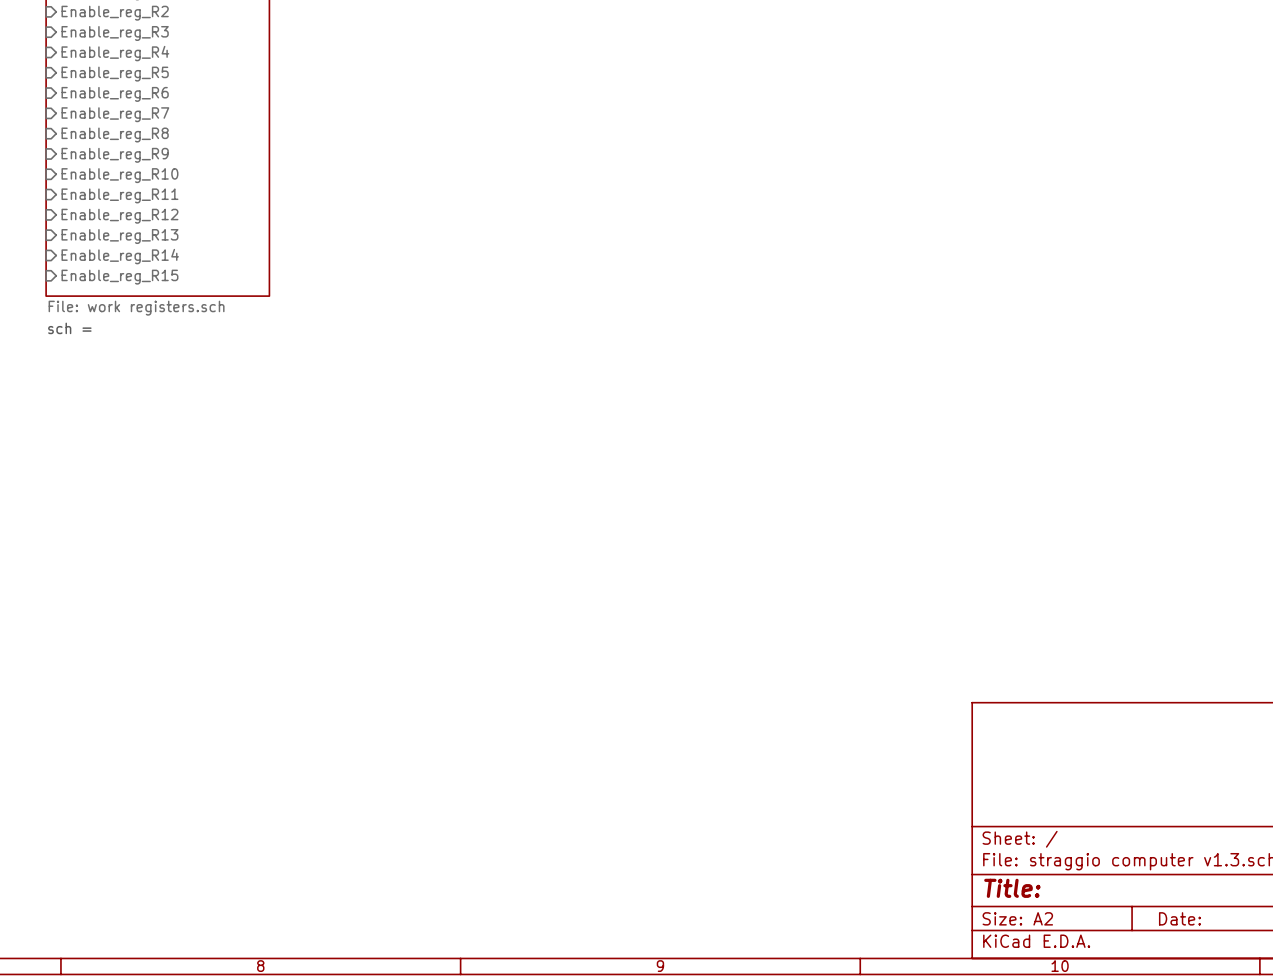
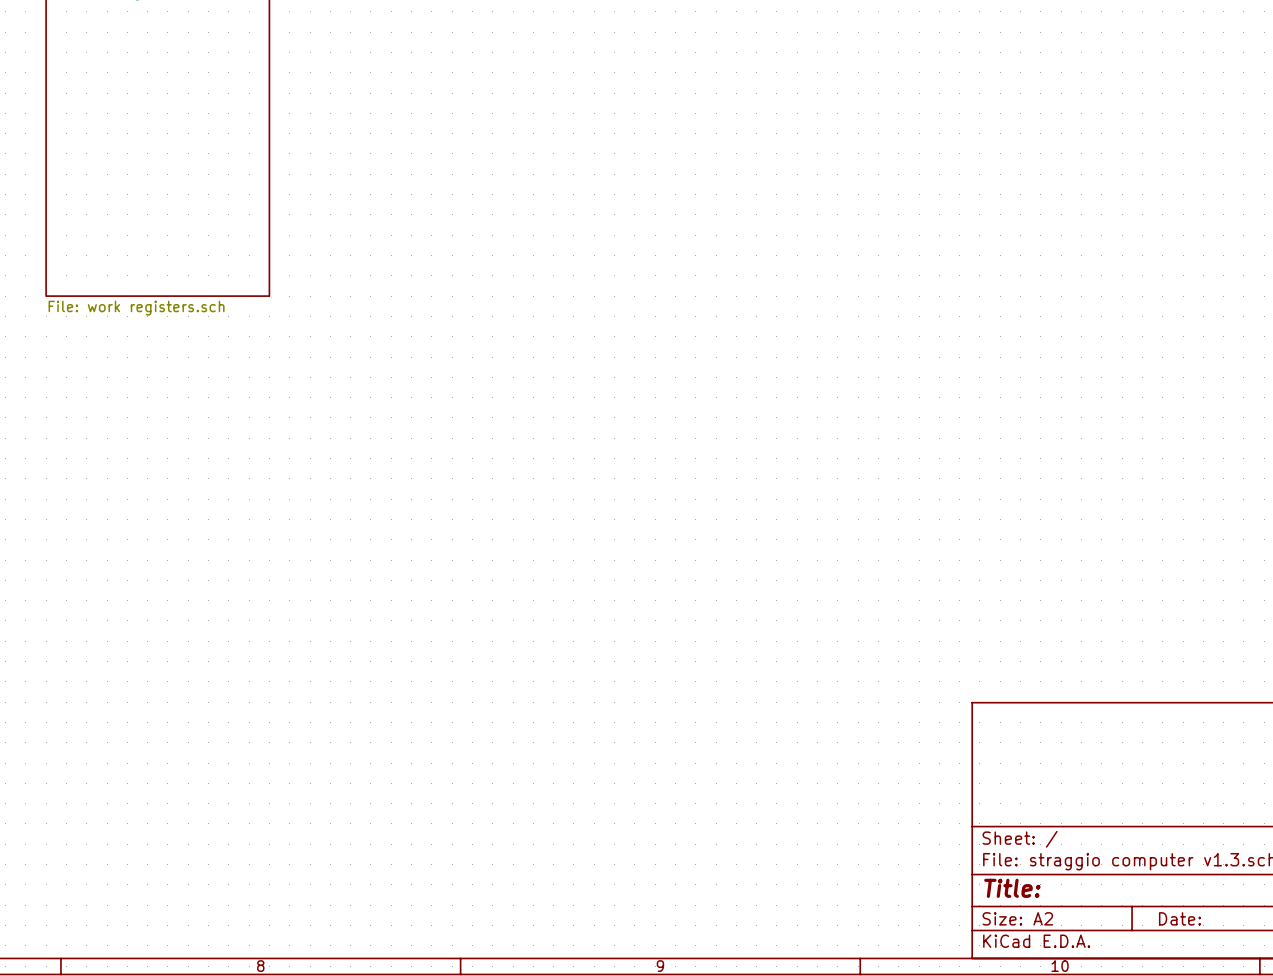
sheet pin: Enable_reg_R2 (115, 13) -> none
sheet pin: Enable_reg_R3 (115, 33) -> none
sheet pin: Enable_reg_R4 (115, 53) -> none
sheet pin: Enable_reg_R5 (115, 74) -> none
sheet pin: Enable_reg_R6 (115, 94) -> none
sheet pin: Enable_reg_R7 (115, 114) -> none
sheet pin: Enable_reg_R8 (115, 135) -> none
sheet pin: Enable_reg_R9 (115, 155) -> none
sheet pin: Enable_reg_R10 (119, 175) -> none
sheet pin: Enable_reg_R11 (119, 195) -> none
sheet pin: Enable_reg_R12 (119, 216) -> none
sheet pin: Enable_reg_R13 (119, 236) -> none
sheet pin: Enable_reg_R14 (120, 256) -> none
sheet pin: Enable_reg_R15 (119, 277) -> none
text: sch = (69, 328) -> none

